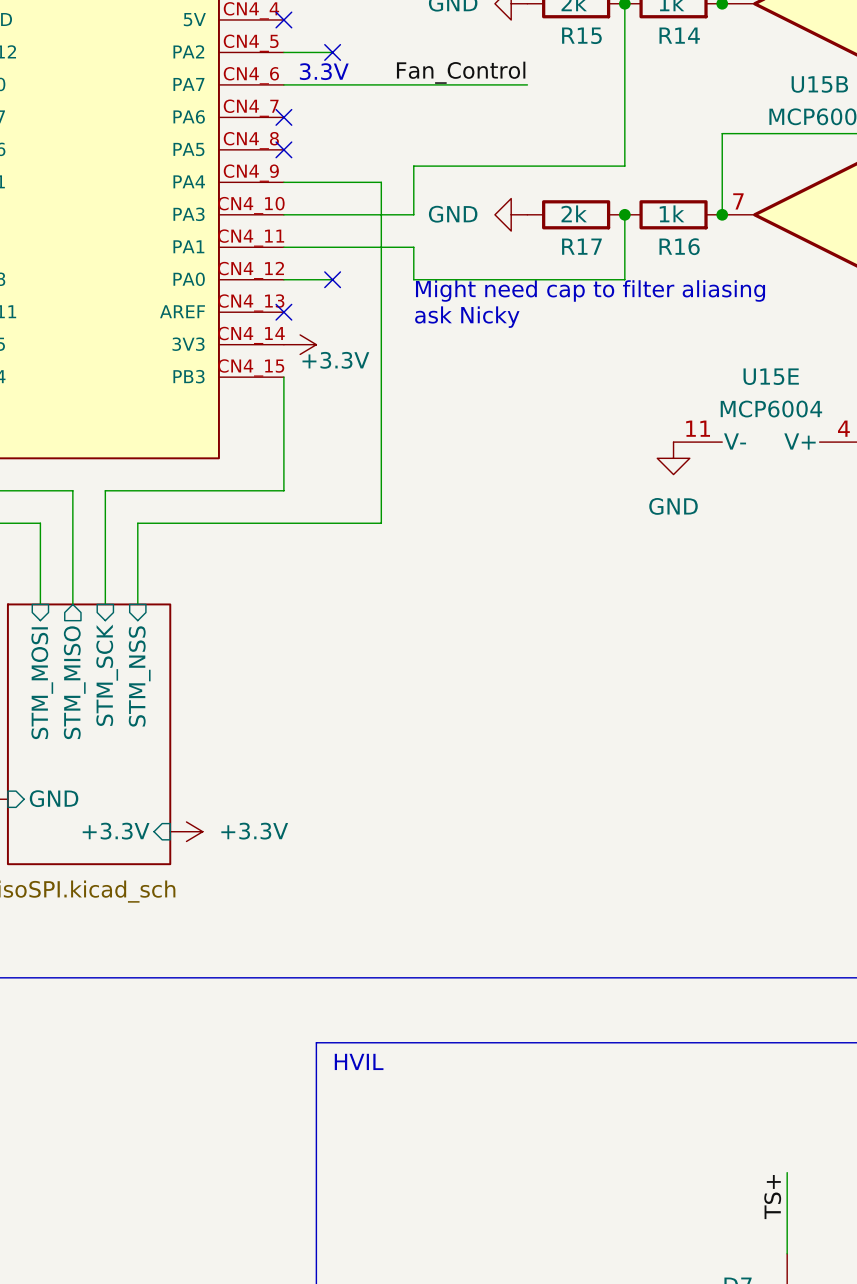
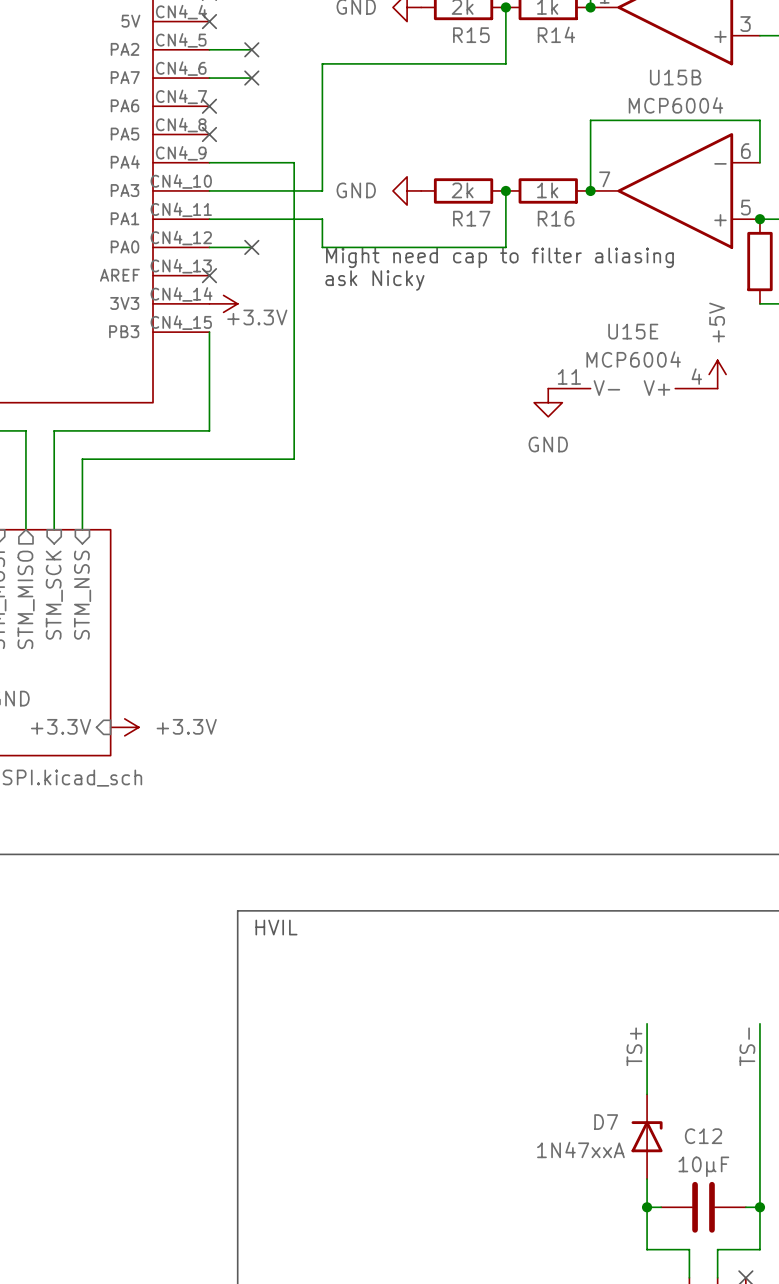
wire: (624, 68) (624, 166) (413, 166) -> (505, 63) (322, 63) (322, 148)
text: 3.3V (324, 71) -> none
label: Fan_Control (461, 72) -> none
wire: (332, 84) (527, 84) -> none
no-connect mark: none -> (251, 78)

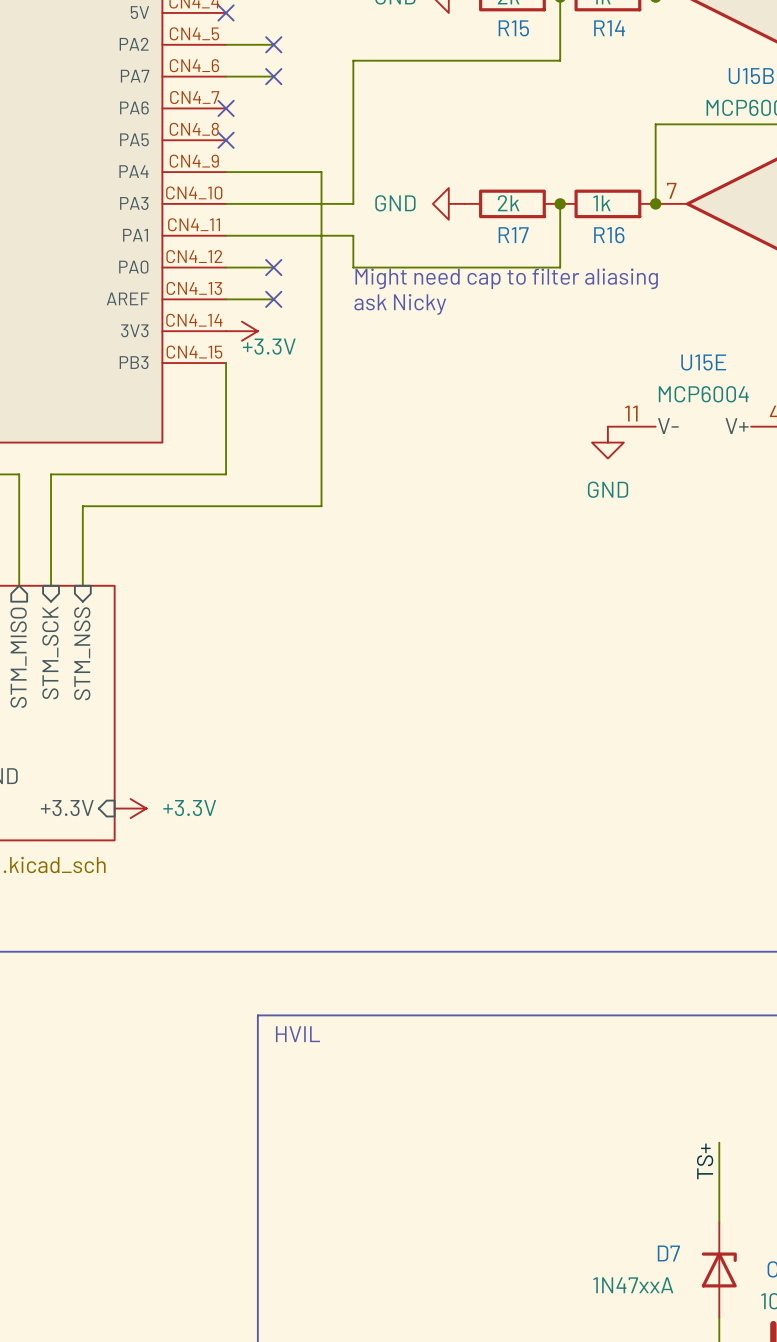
wire: none -> (226, 299) (273, 299)
no-connect mark position: (209, 275) -> (273, 299)

